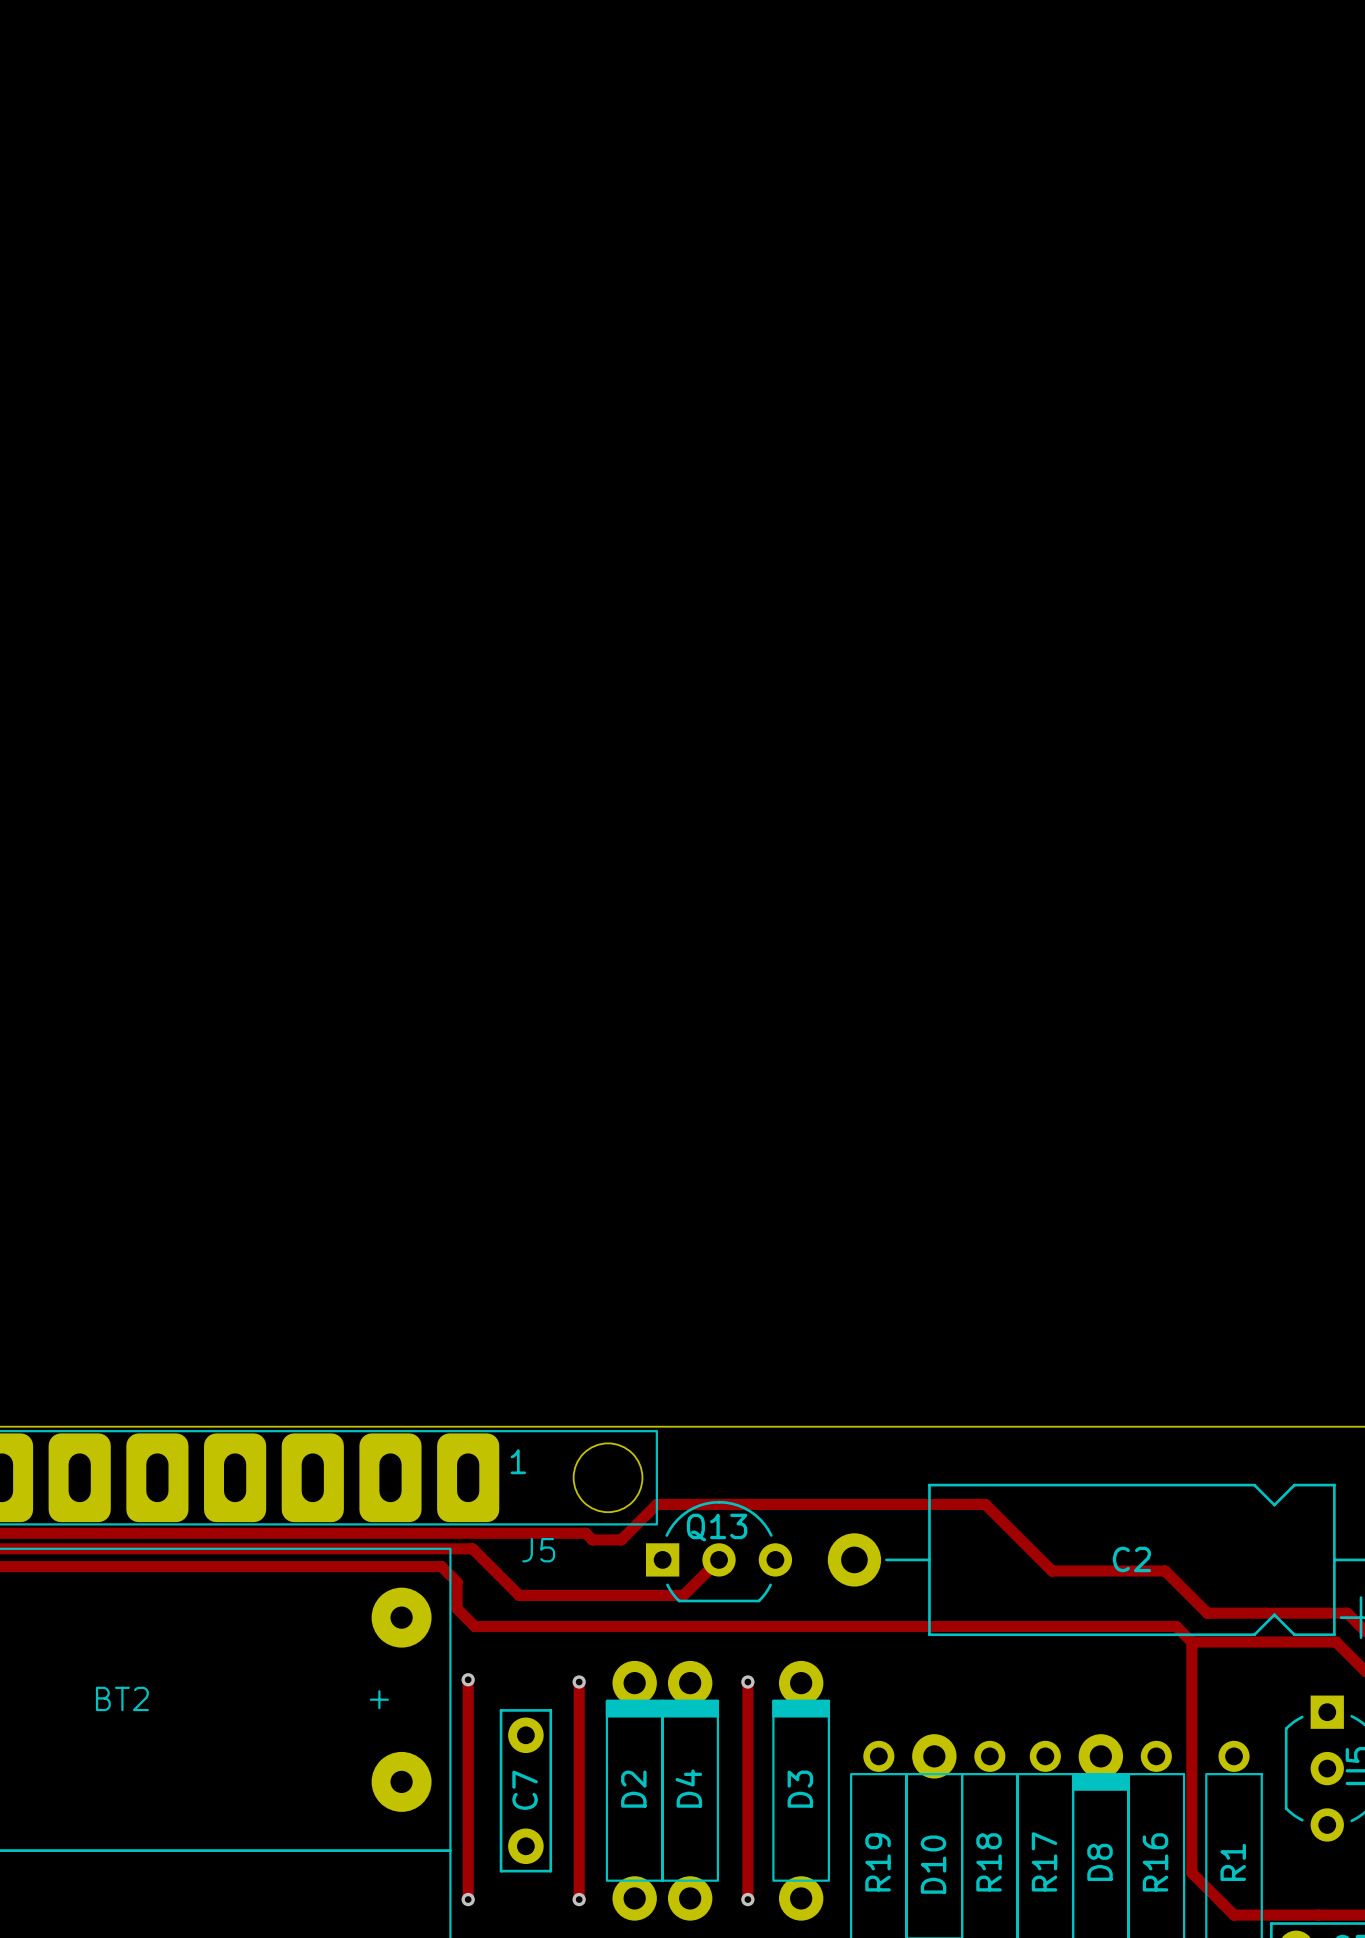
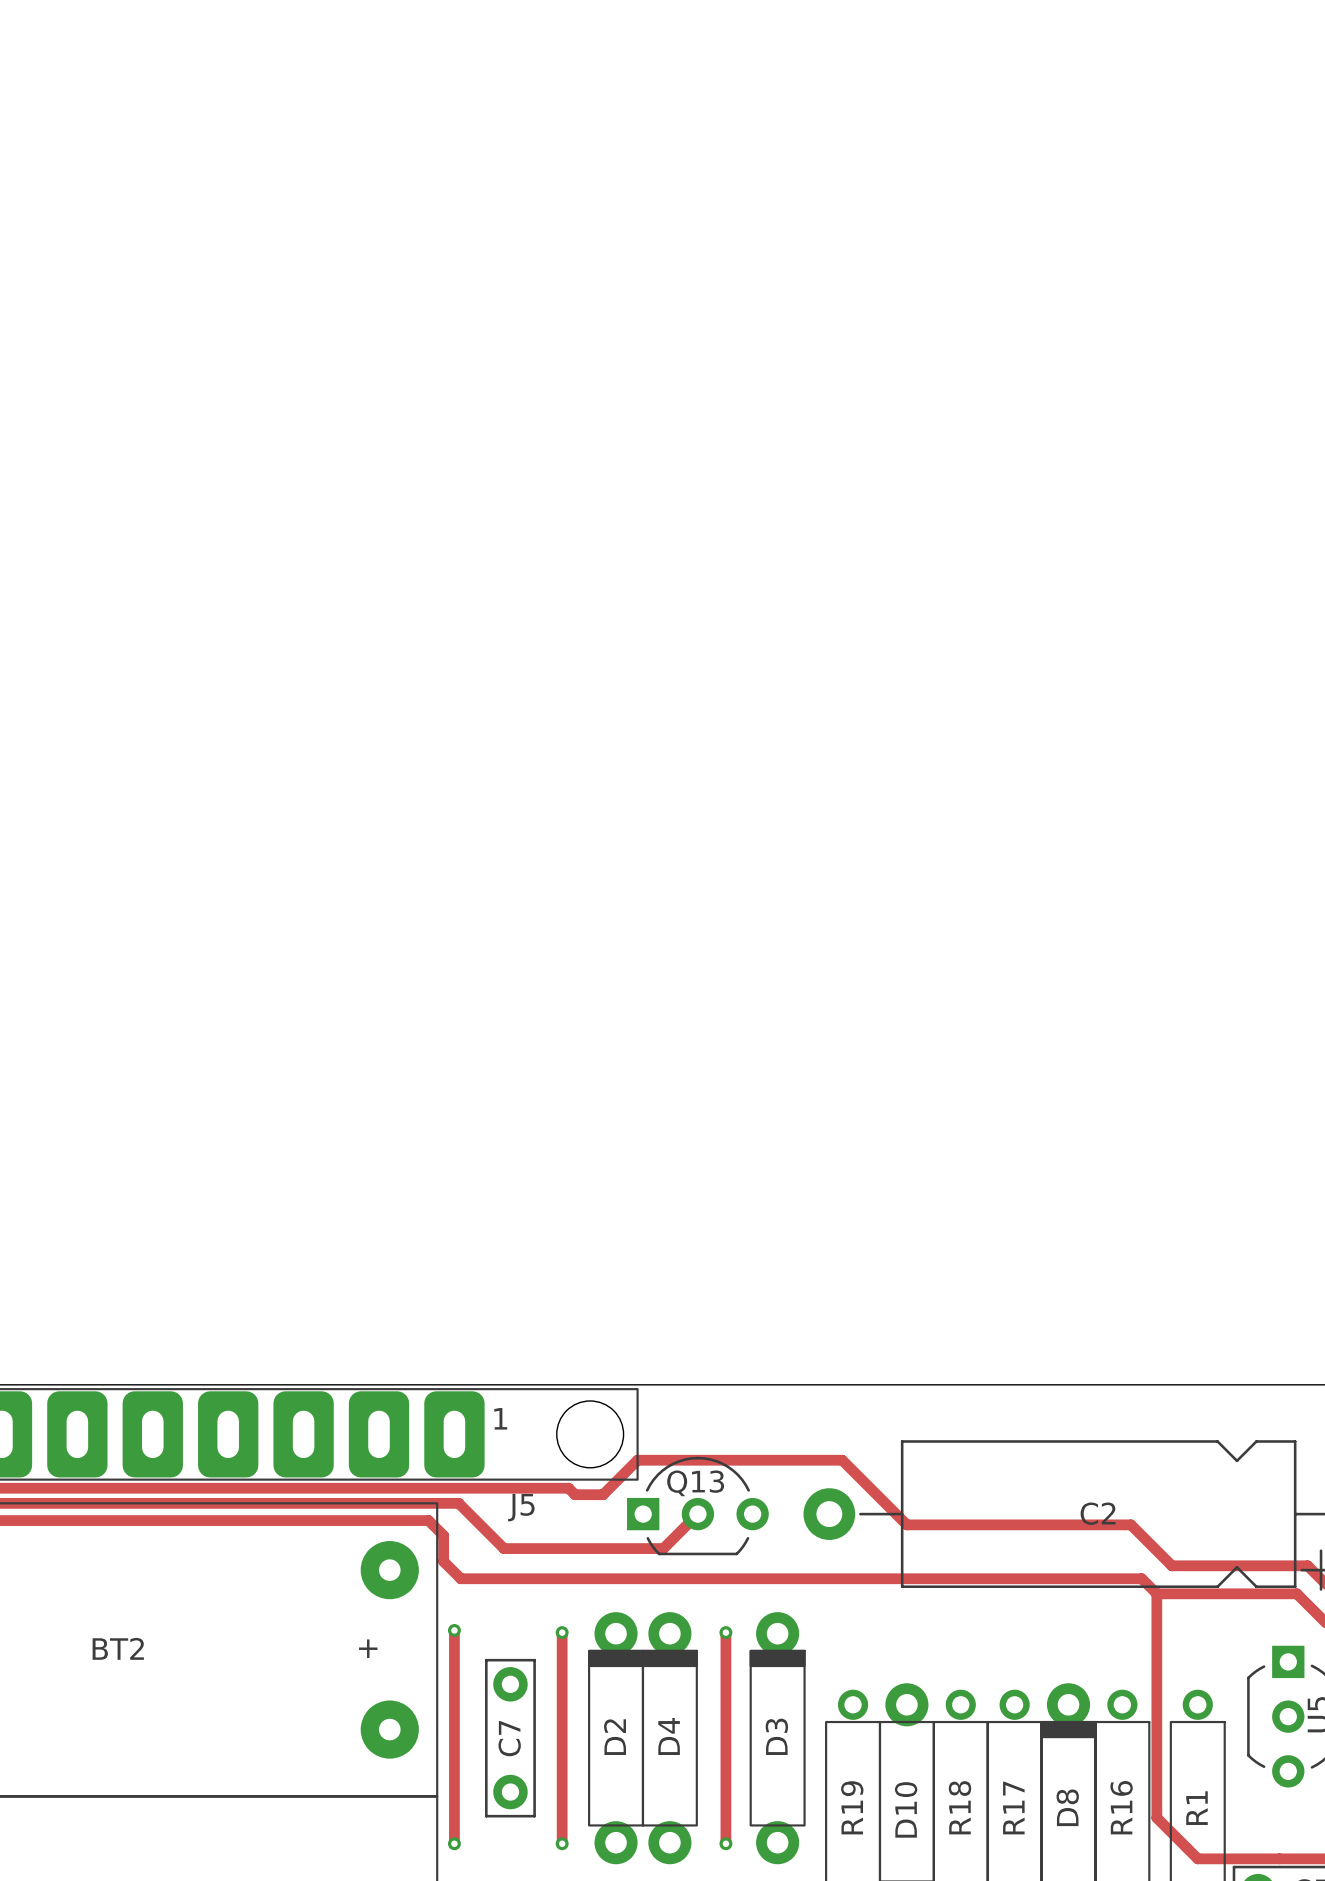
track: (867, 1504) (985, 1504) (1052, 1571) -> (842, 1460) (906, 1524) (1021, 1524)

